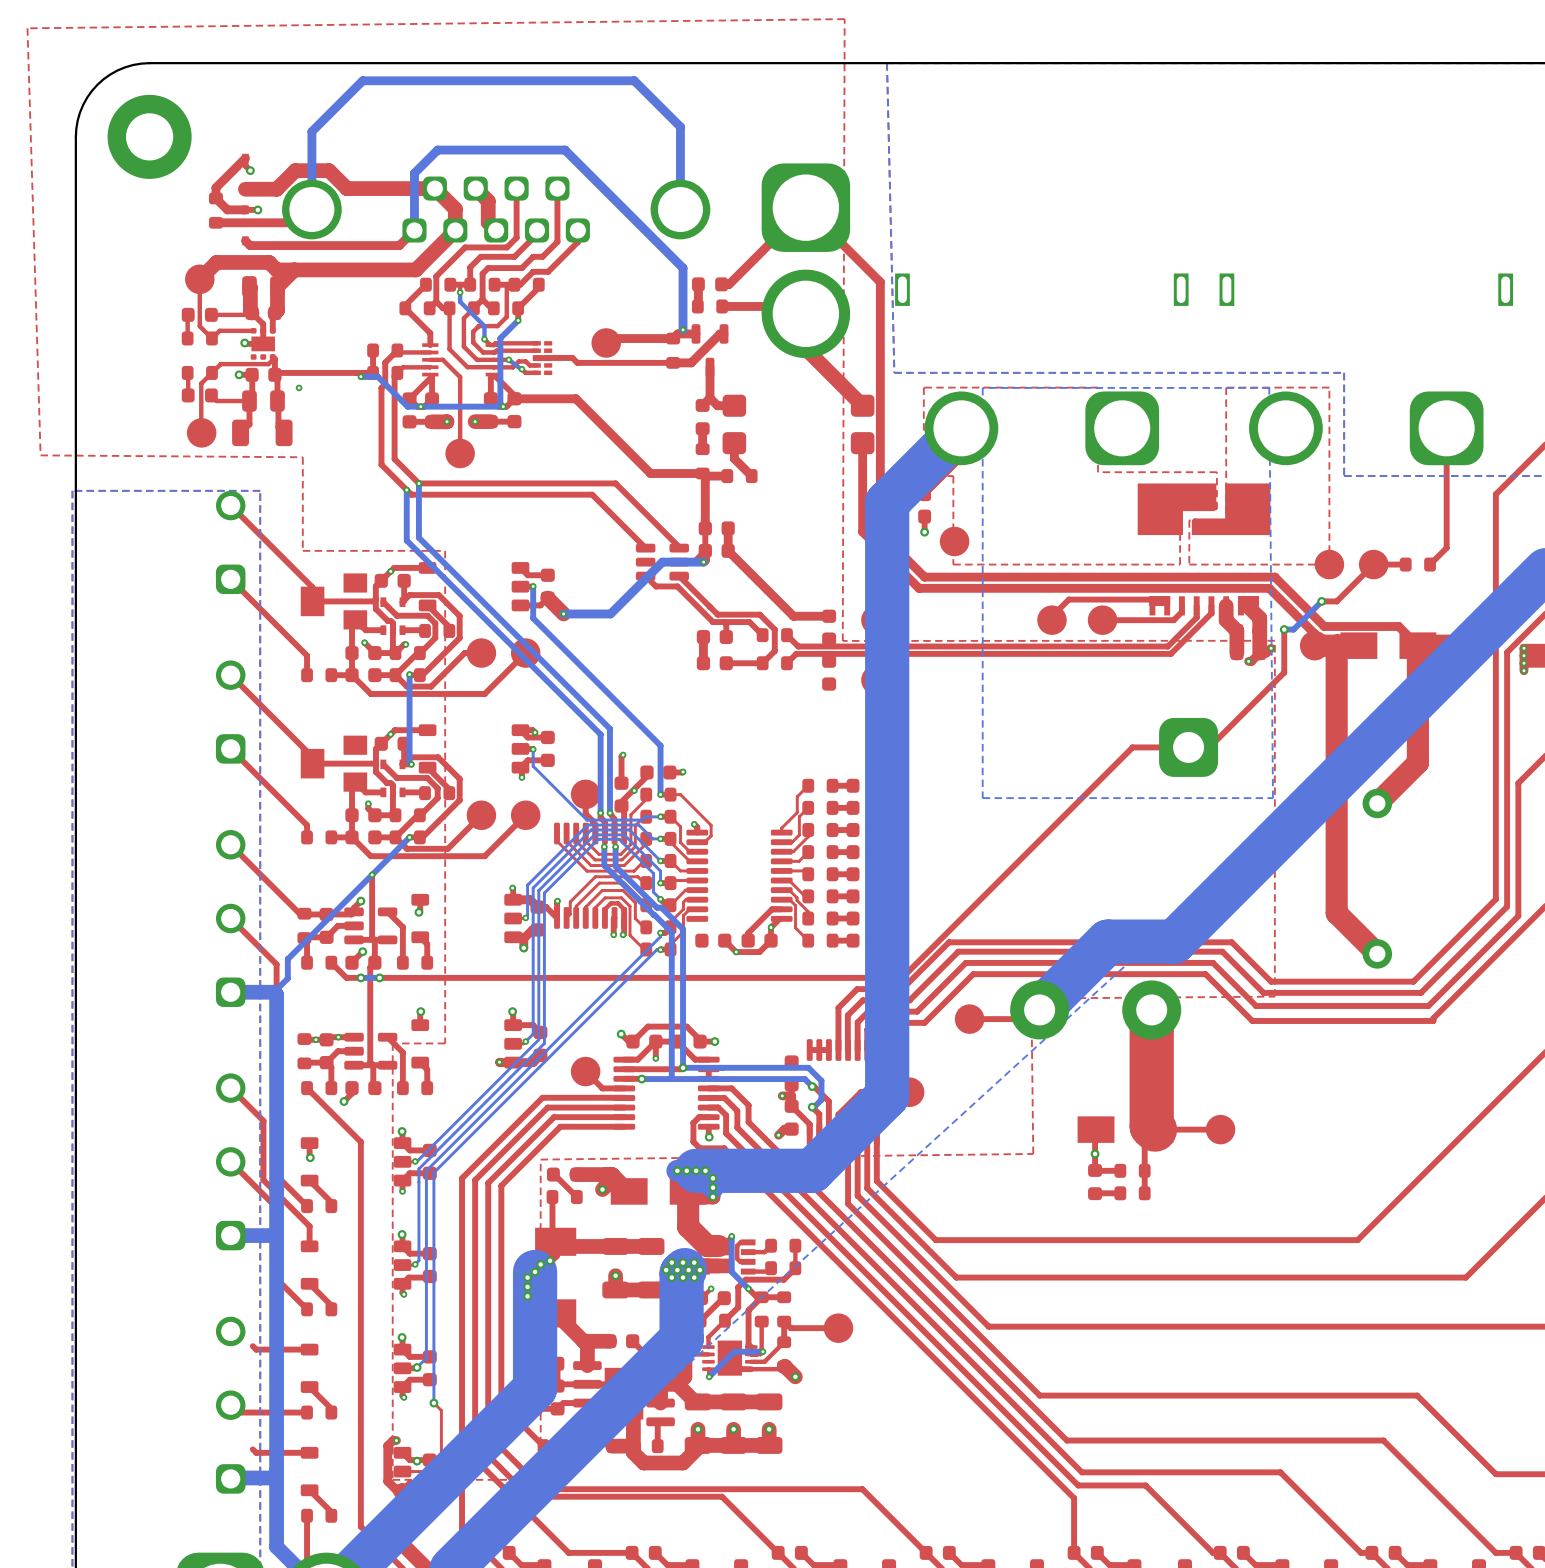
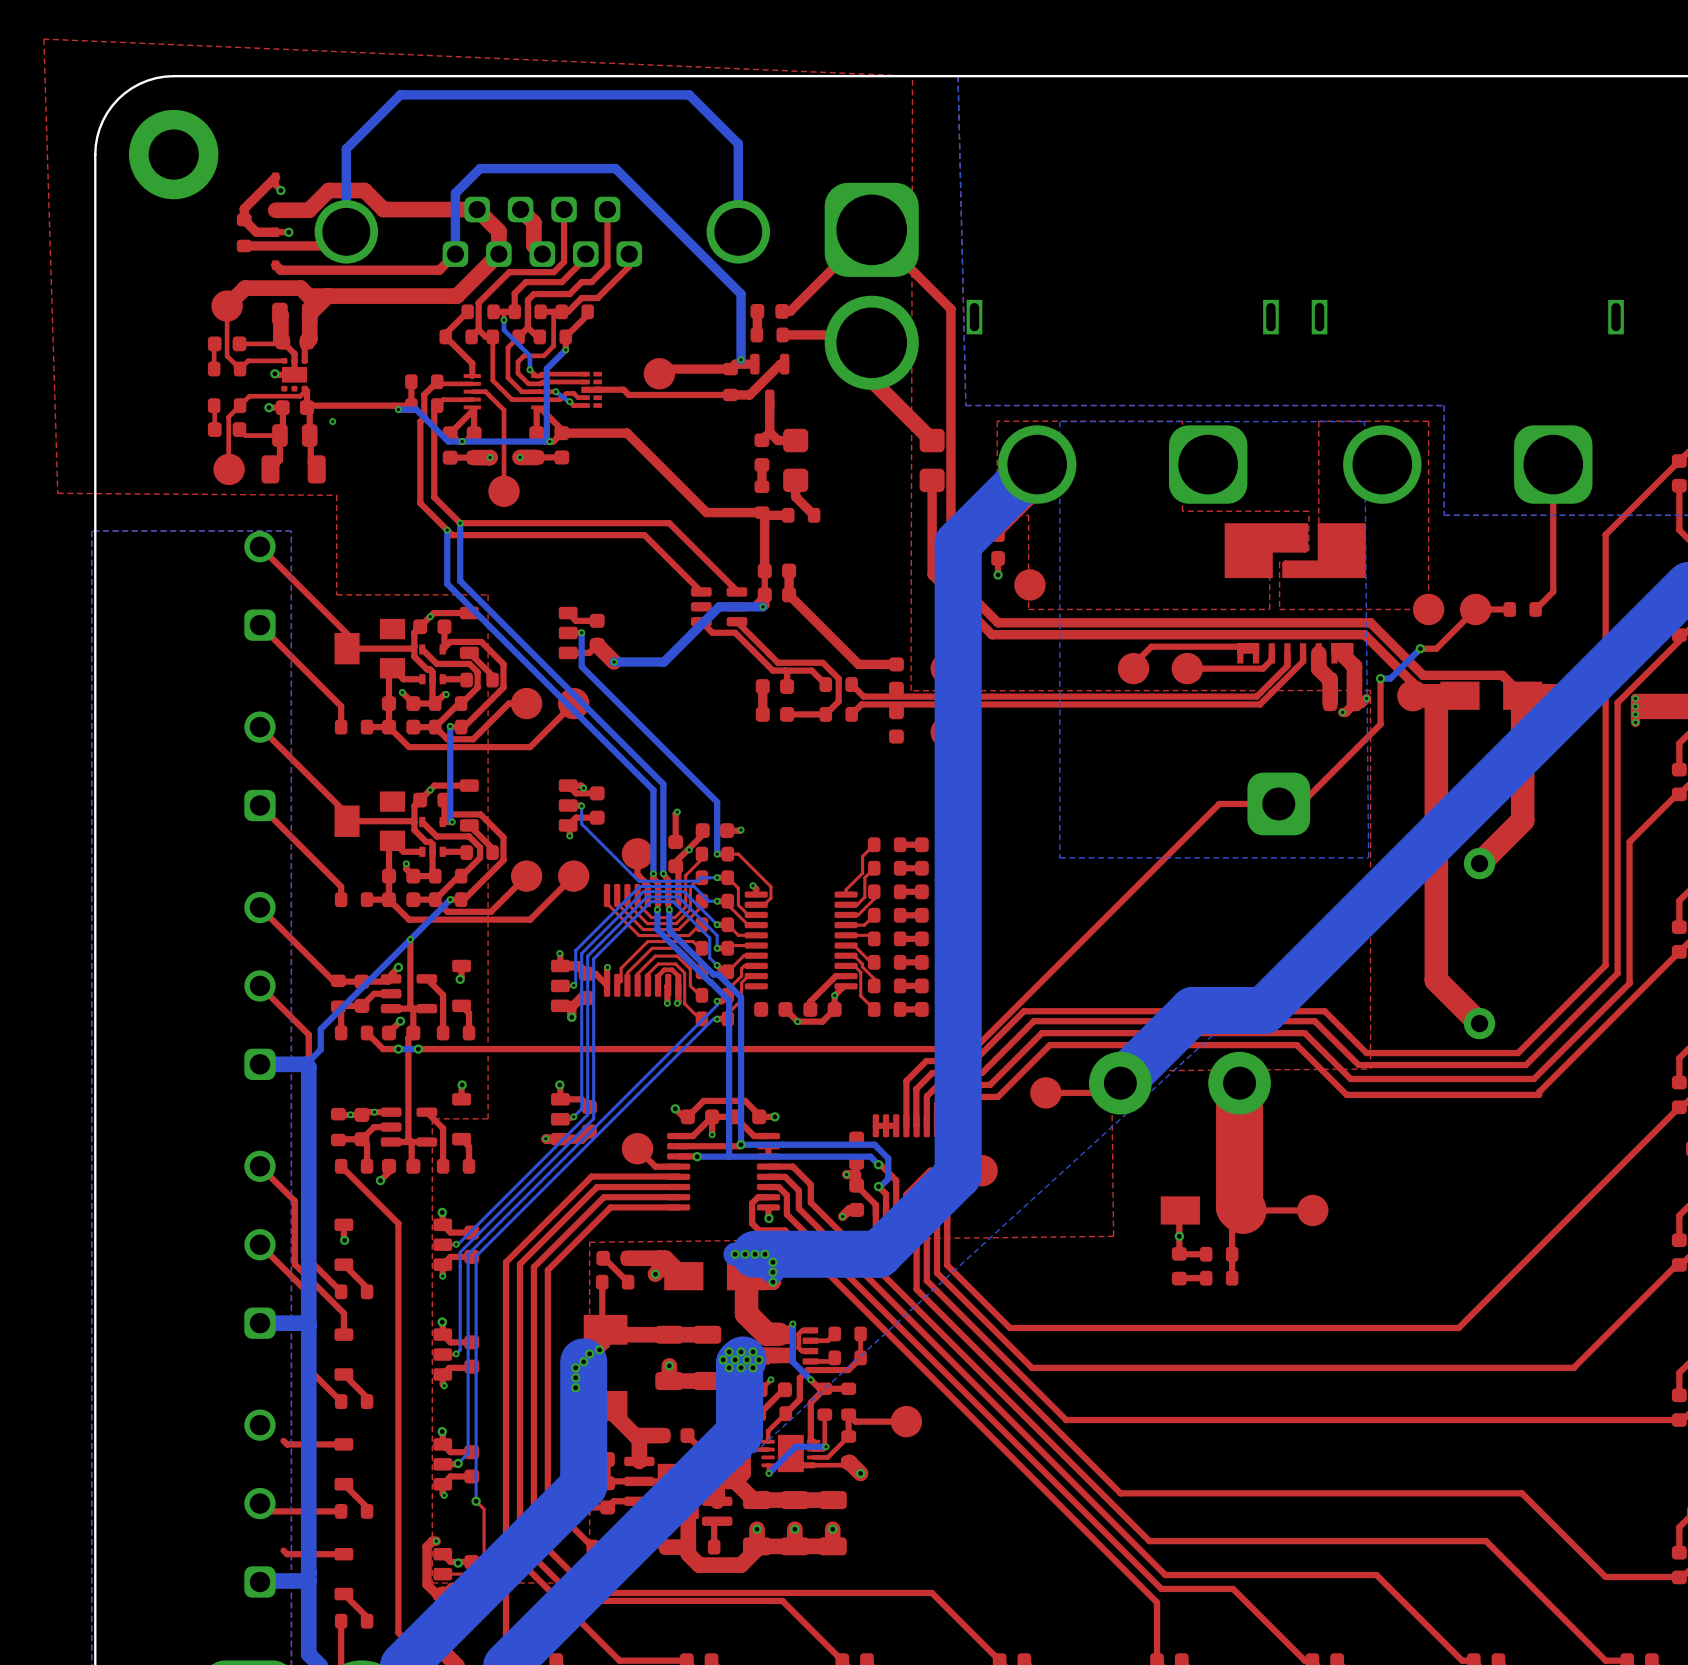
top zone outline: (27, 28) (844, 19) (842, 640) -> (43, 39) (912, 76) (911, 690)

